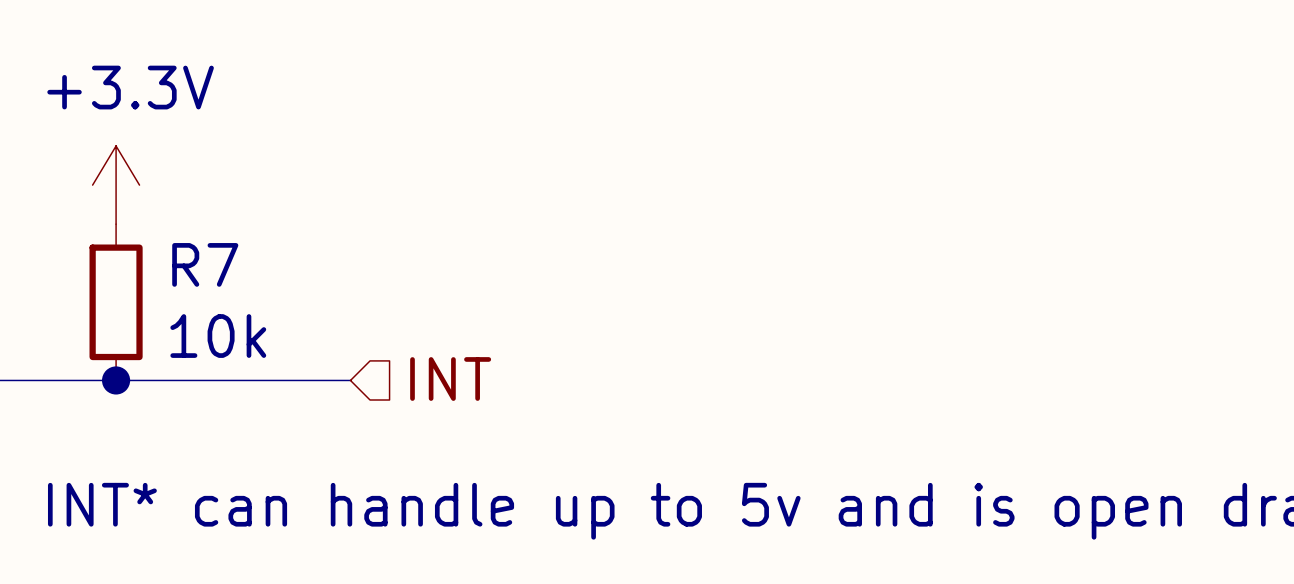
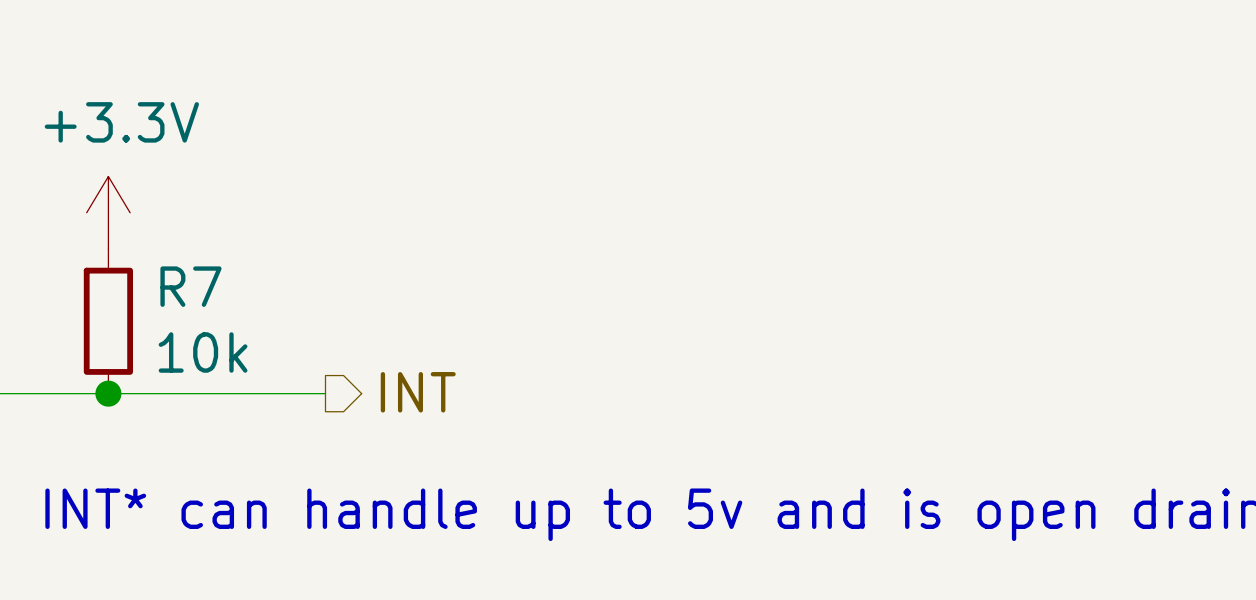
hierarchical label shape: input (450, 379) -> output (418, 392)

